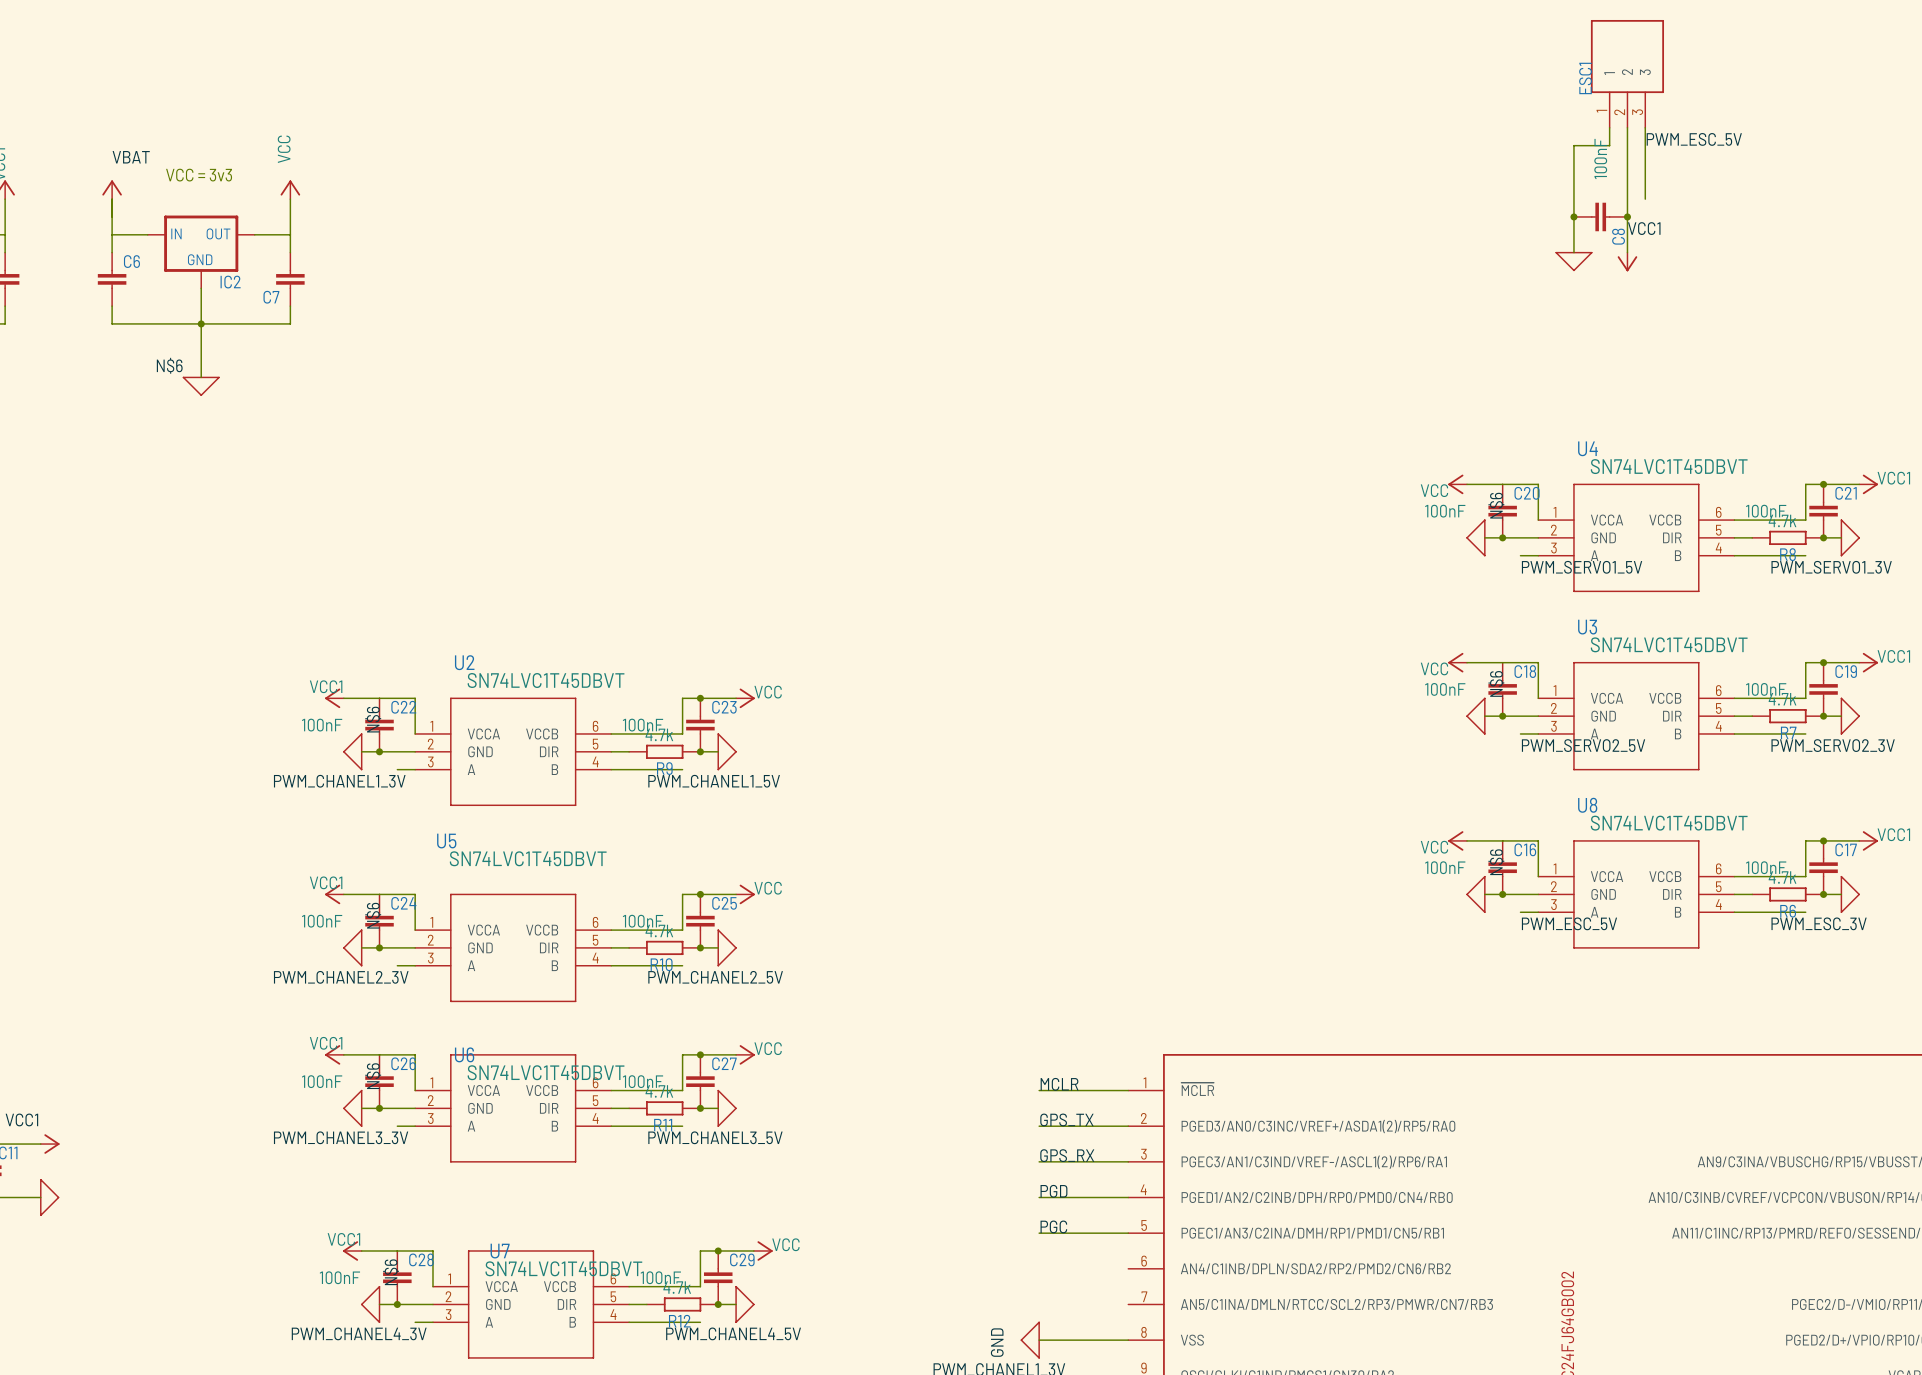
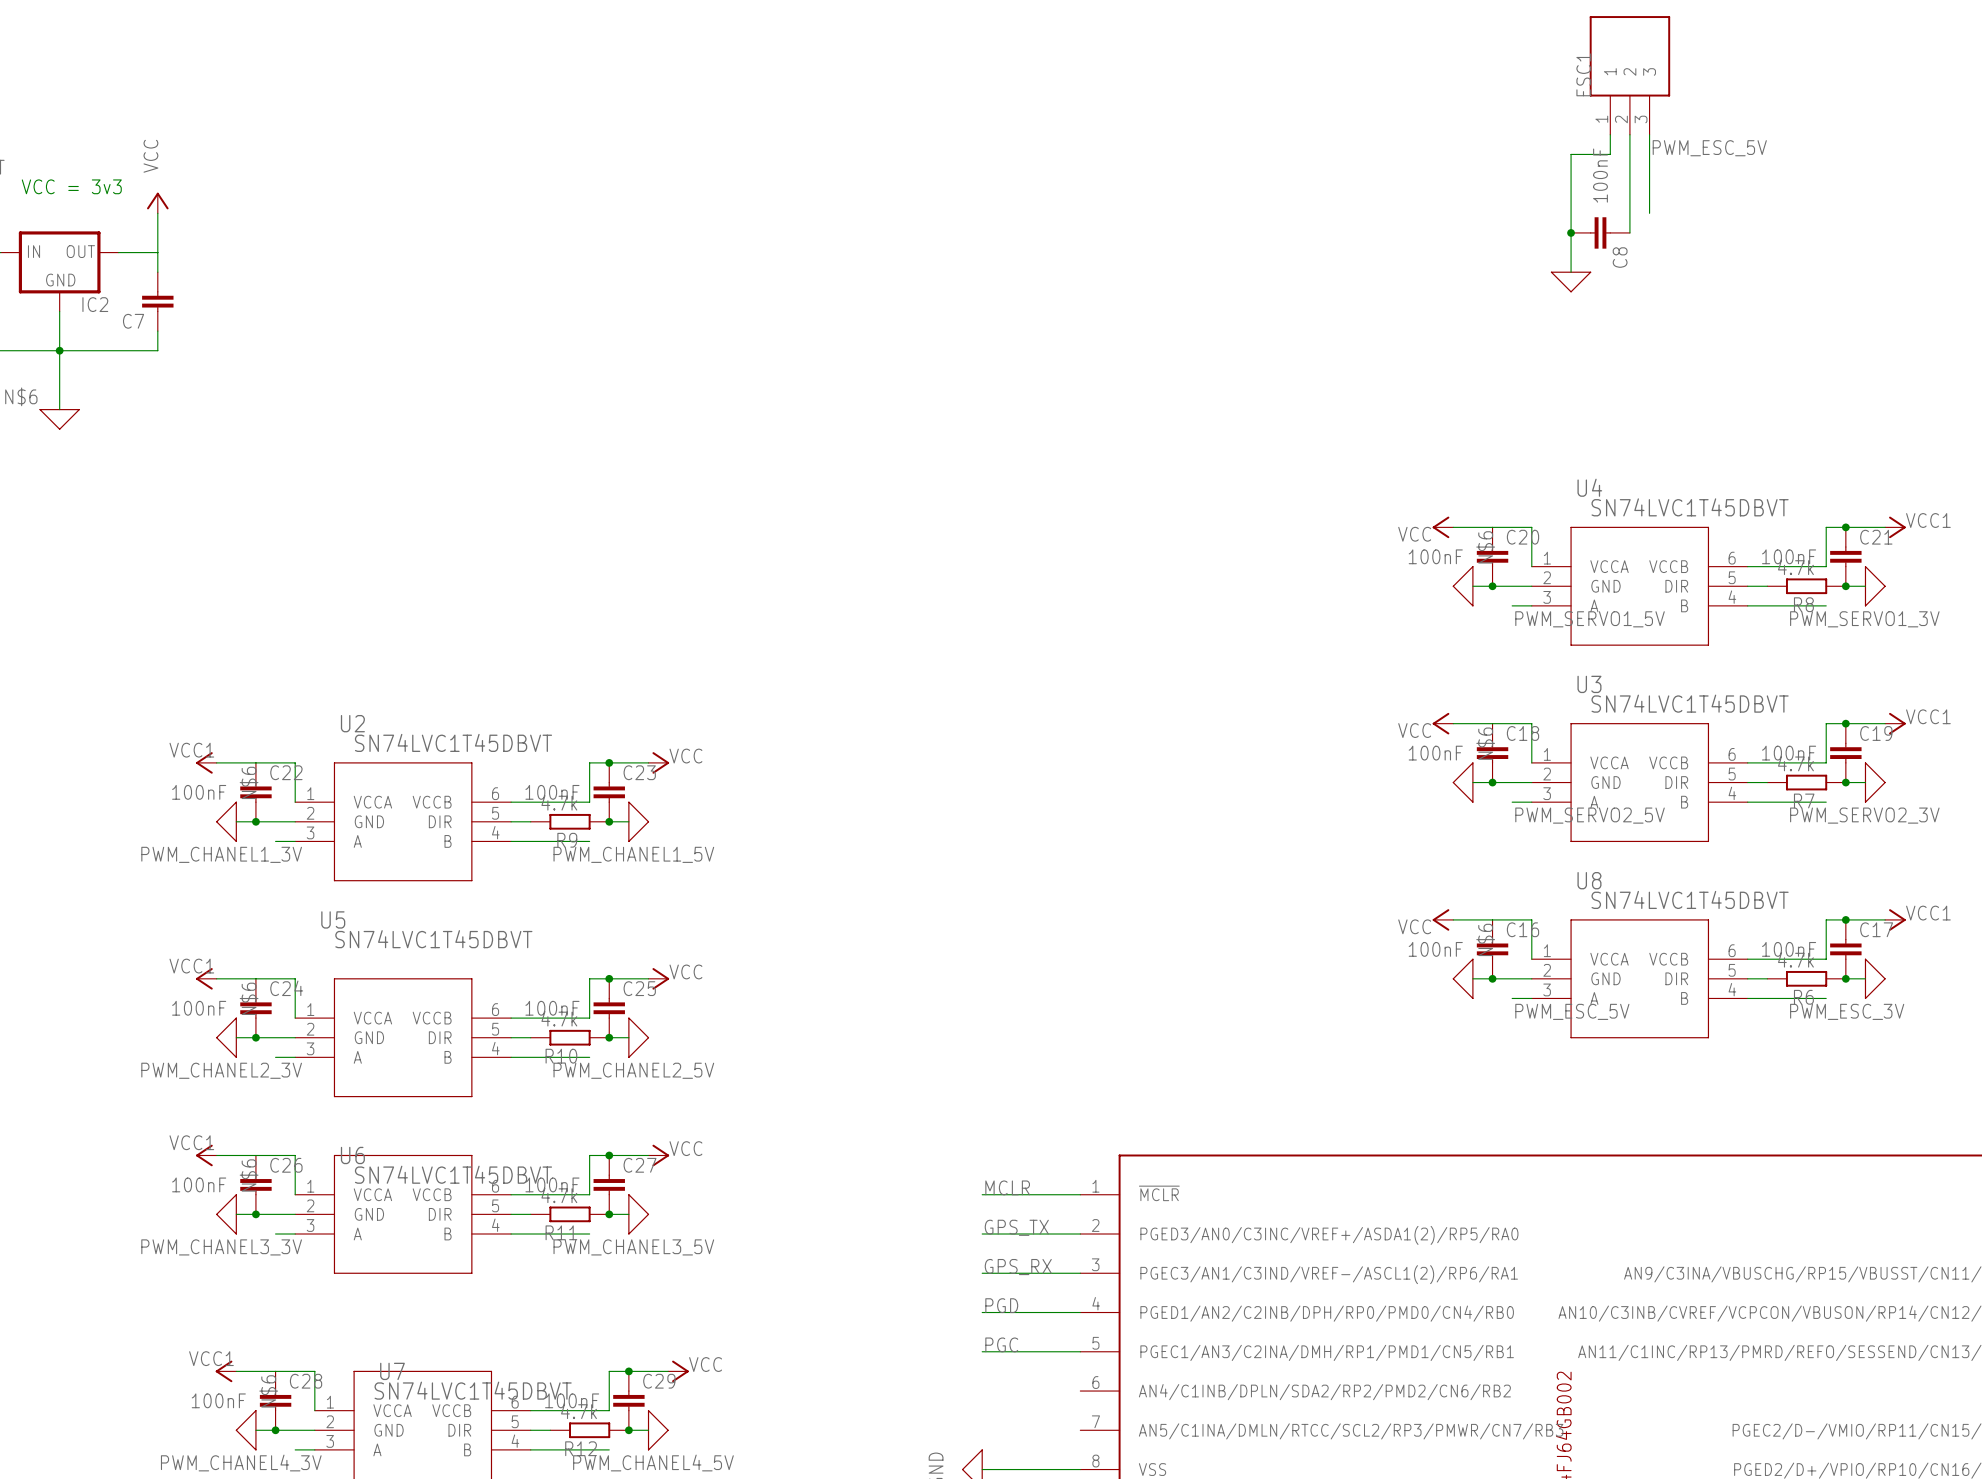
wire: (1627, 216) (1627, 252) -> none
junction: (1627, 216) -> none
label: VCC1 (1644, 228) -> none
power symbol: (1627, 261) -> none

